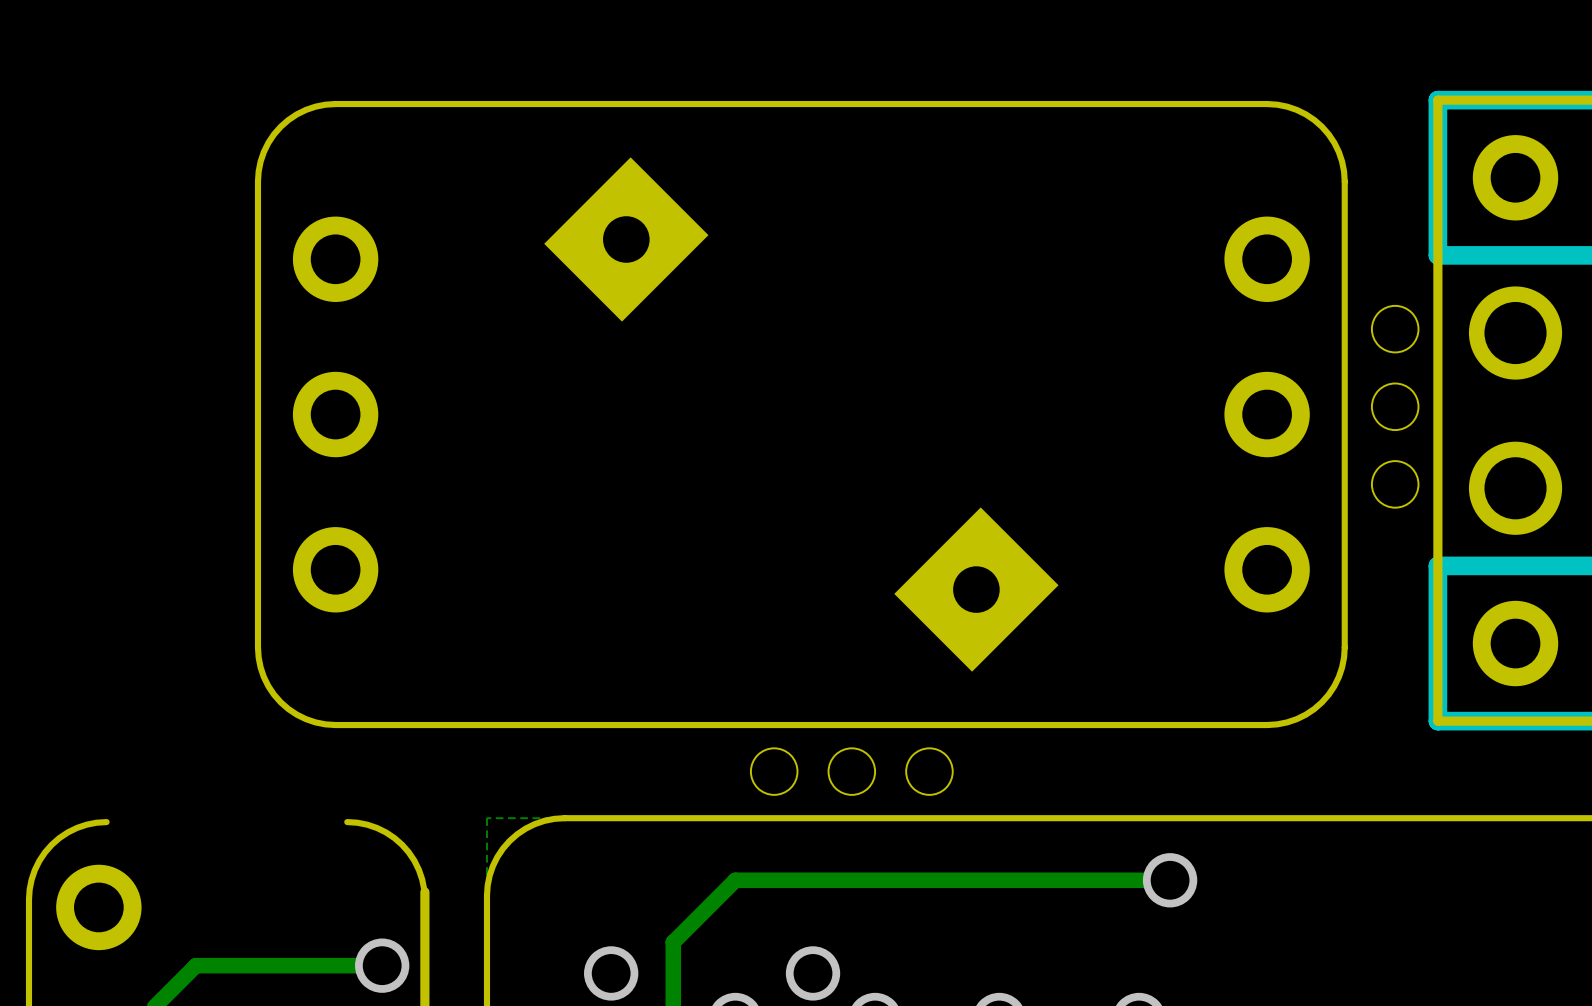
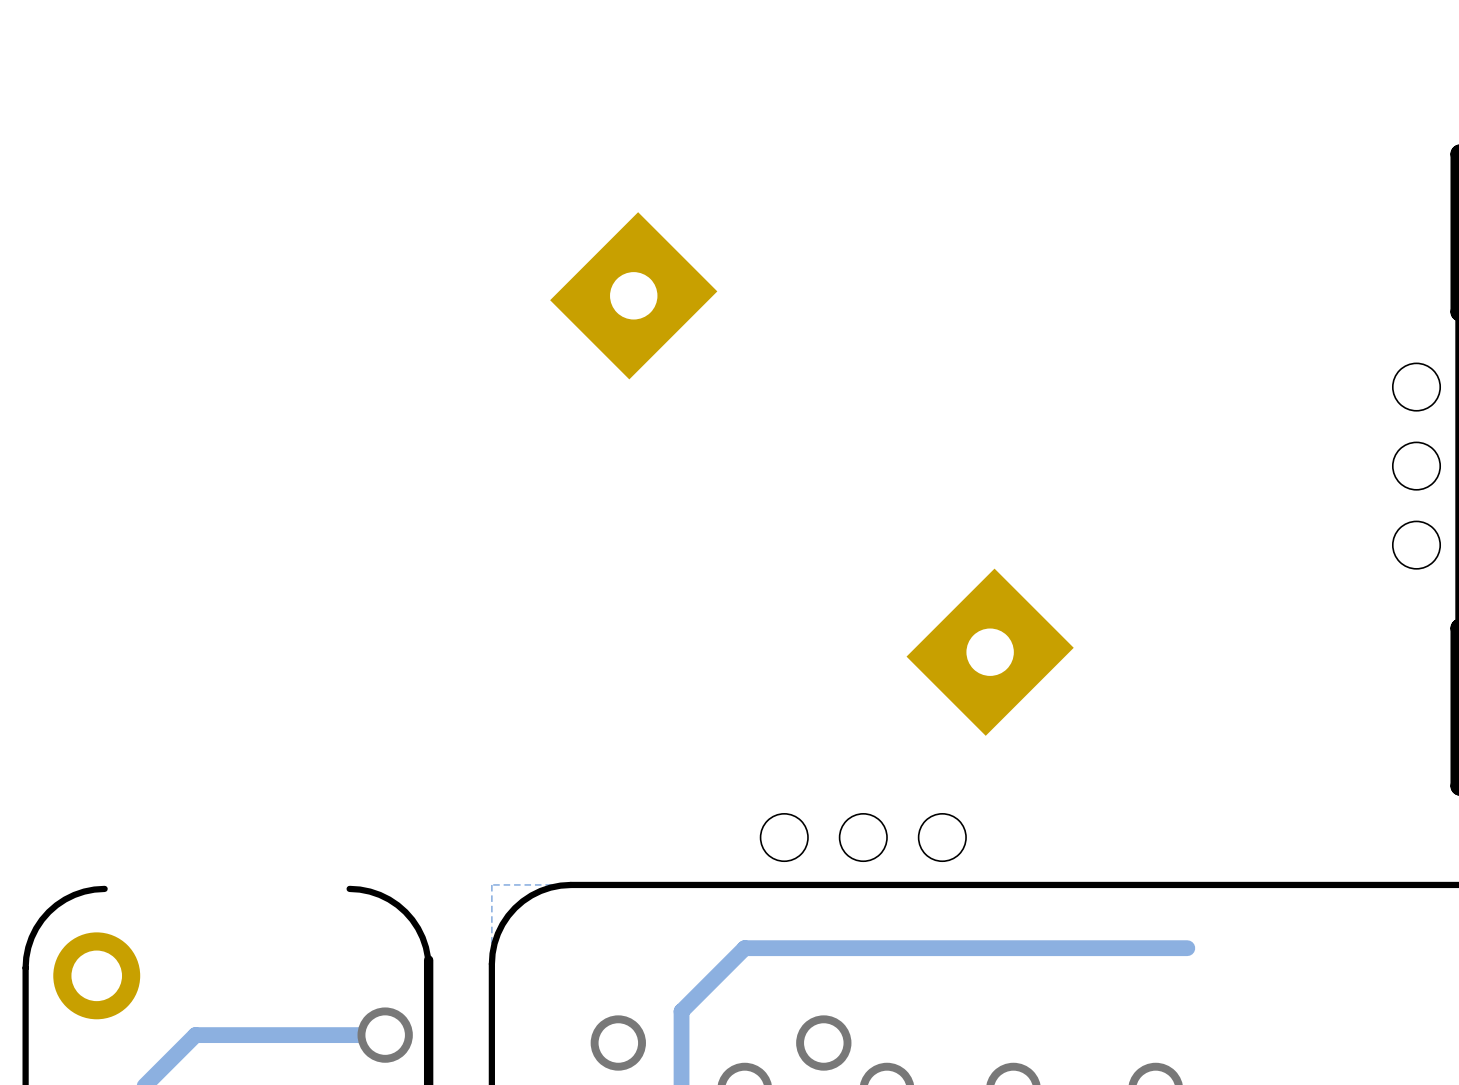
board edge: (1267, 104) (335, 104) (315, 106) (296, 114) (280, 126) (268, 142) (260, 161) (257, 181) (257, 647) (260, 667) (268, 686) (280, 702) (296, 714) (315, 722) (335, 725) (1267, 725) (1287, 722) (1305, 714) (1322, 702) (1334, 686) (1344, 657) (1344, 181) (1338, 151) (1322, 126) (1296, 109) (1267, 104) -> none
part: (335, 414) -> none
part: (1267, 414) -> none
via: (1170, 880) -> none

